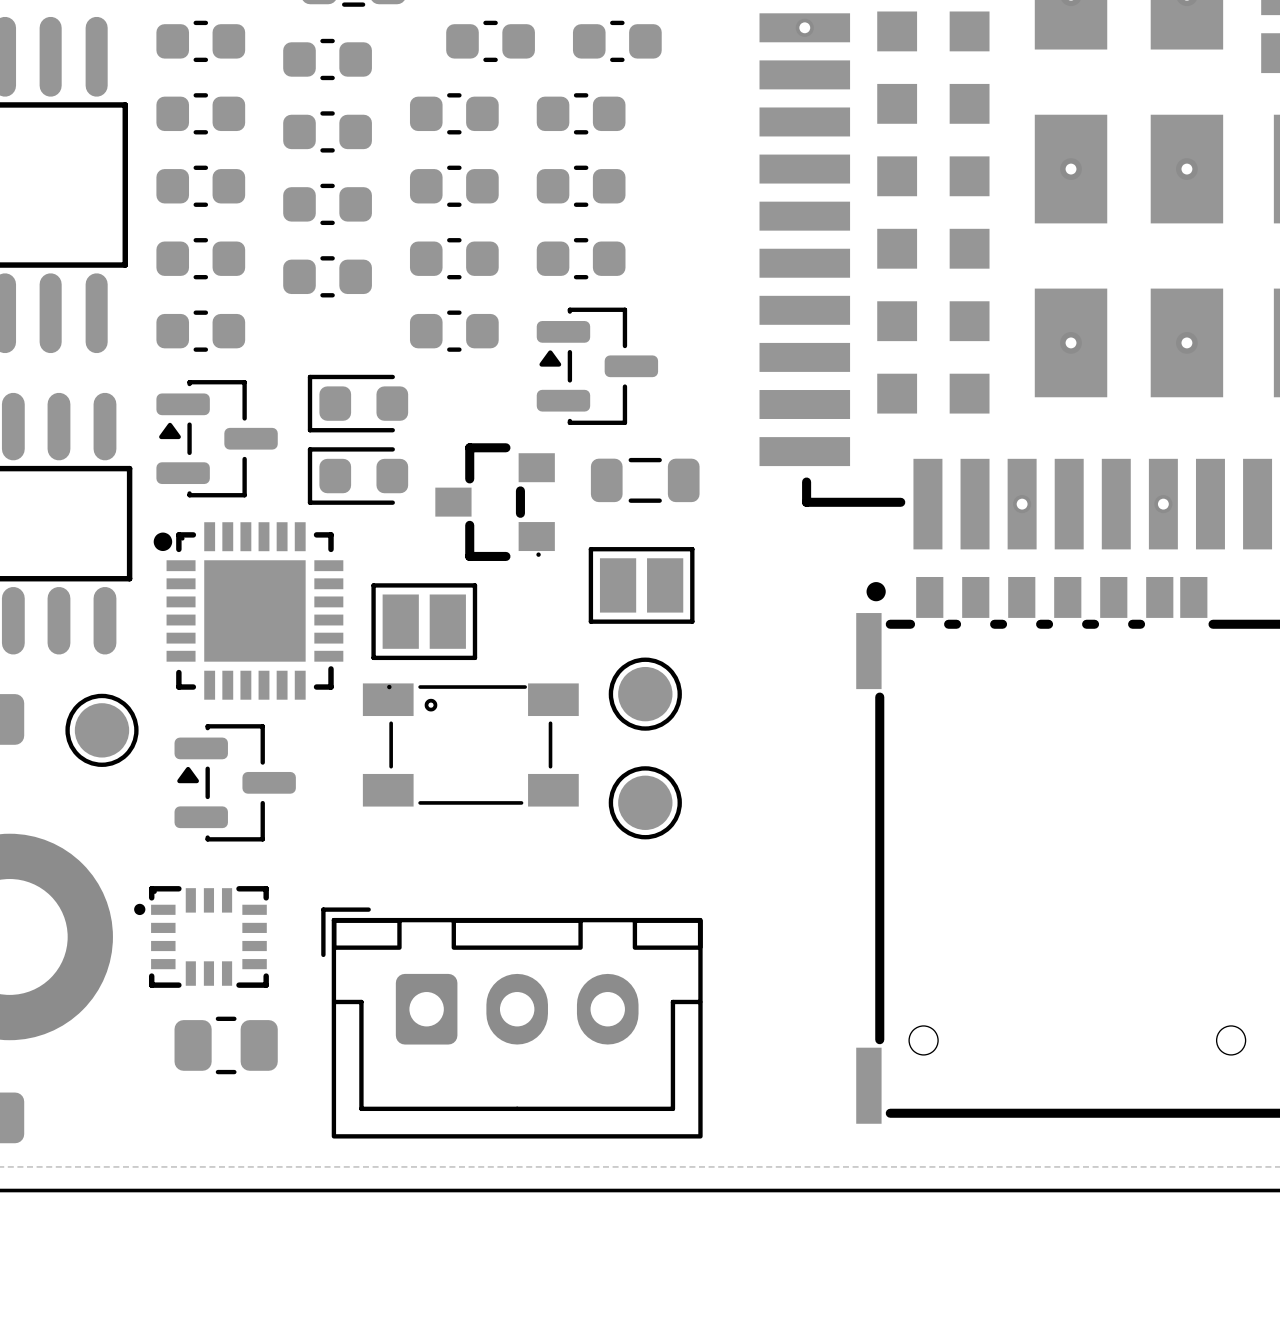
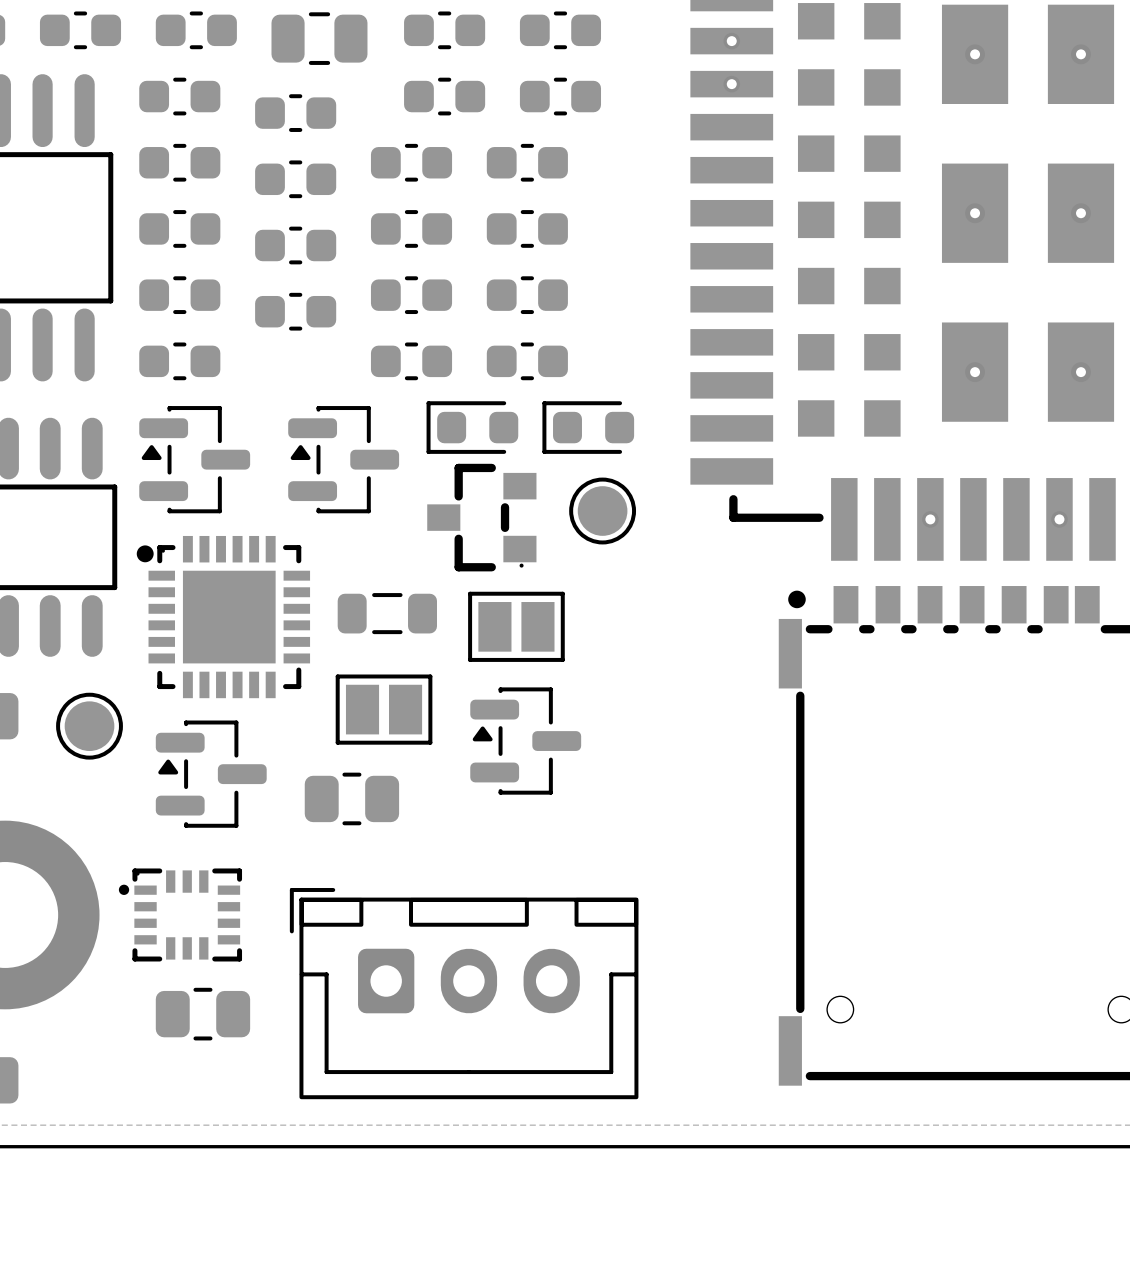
part: none -> (527, 361)
part: (597, 366) -> none
part: (357, 403) -> none
part: none -> (472, 427)
part: none -> (588, 427)
part: none -> (343, 459)
part footprint: [590, 457, 700, 503] -> [569, 477, 637, 545]
part: (357, 476) -> none
part position: (495, 502) -> (481, 517)
part footprint: [371, 583, 478, 661] -> [337, 593, 438, 635]
part position: (641, 585) -> (516, 626)
part: (645, 694) -> none
part: none -> (384, 709)
part: (470, 744) -> none
part: none -> (525, 741)
part: (645, 802) -> none
part: none -> (351, 798)

